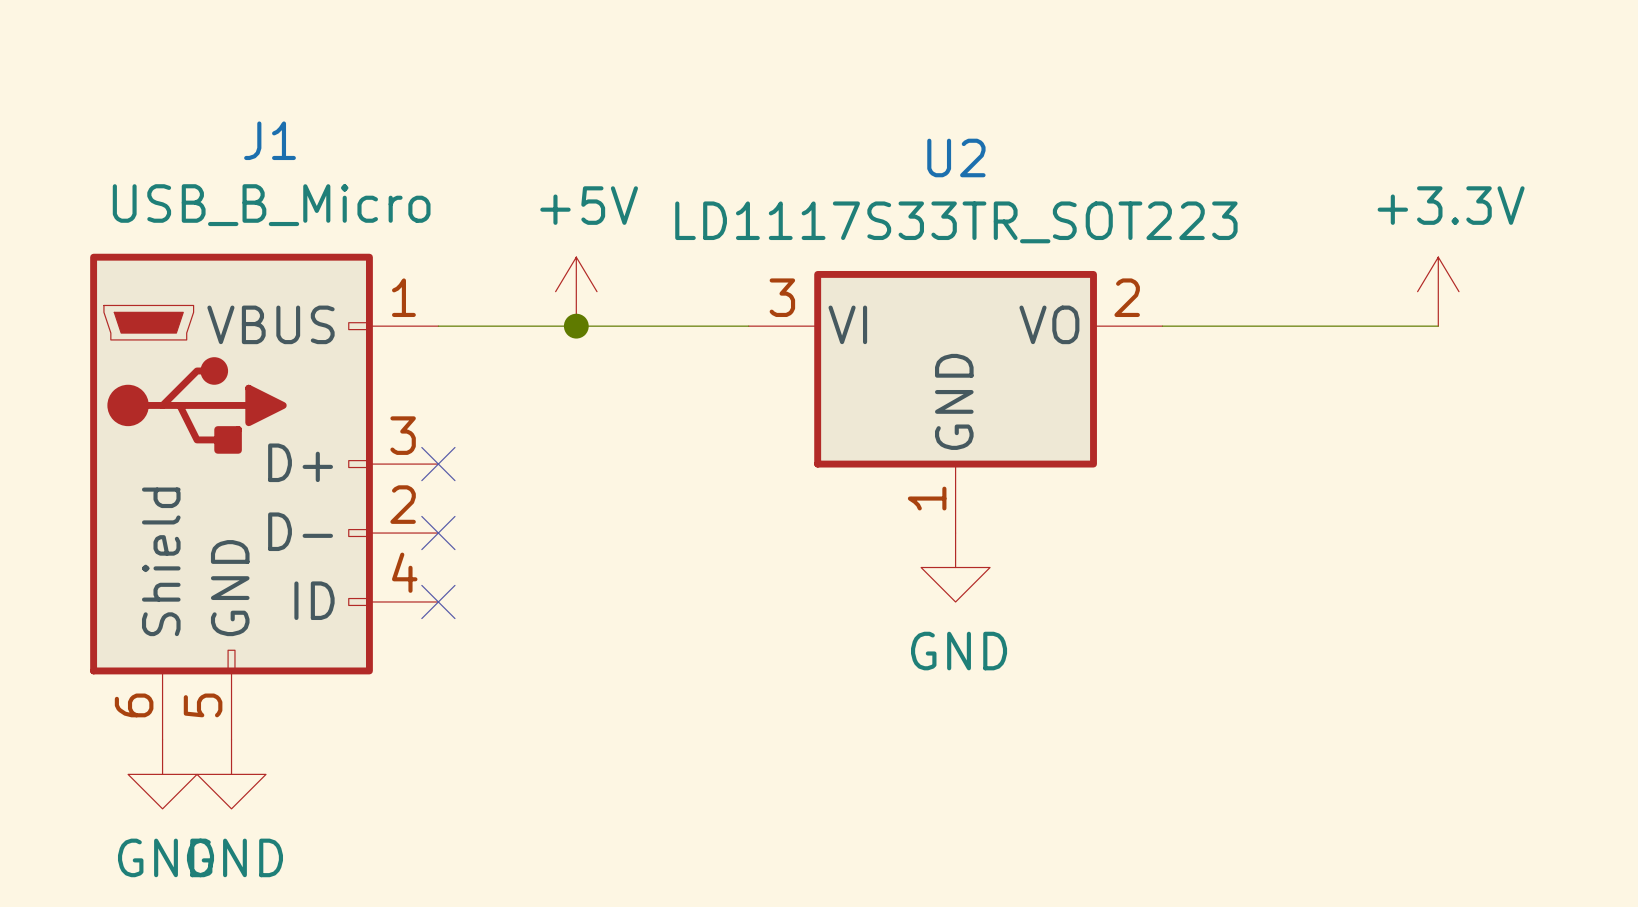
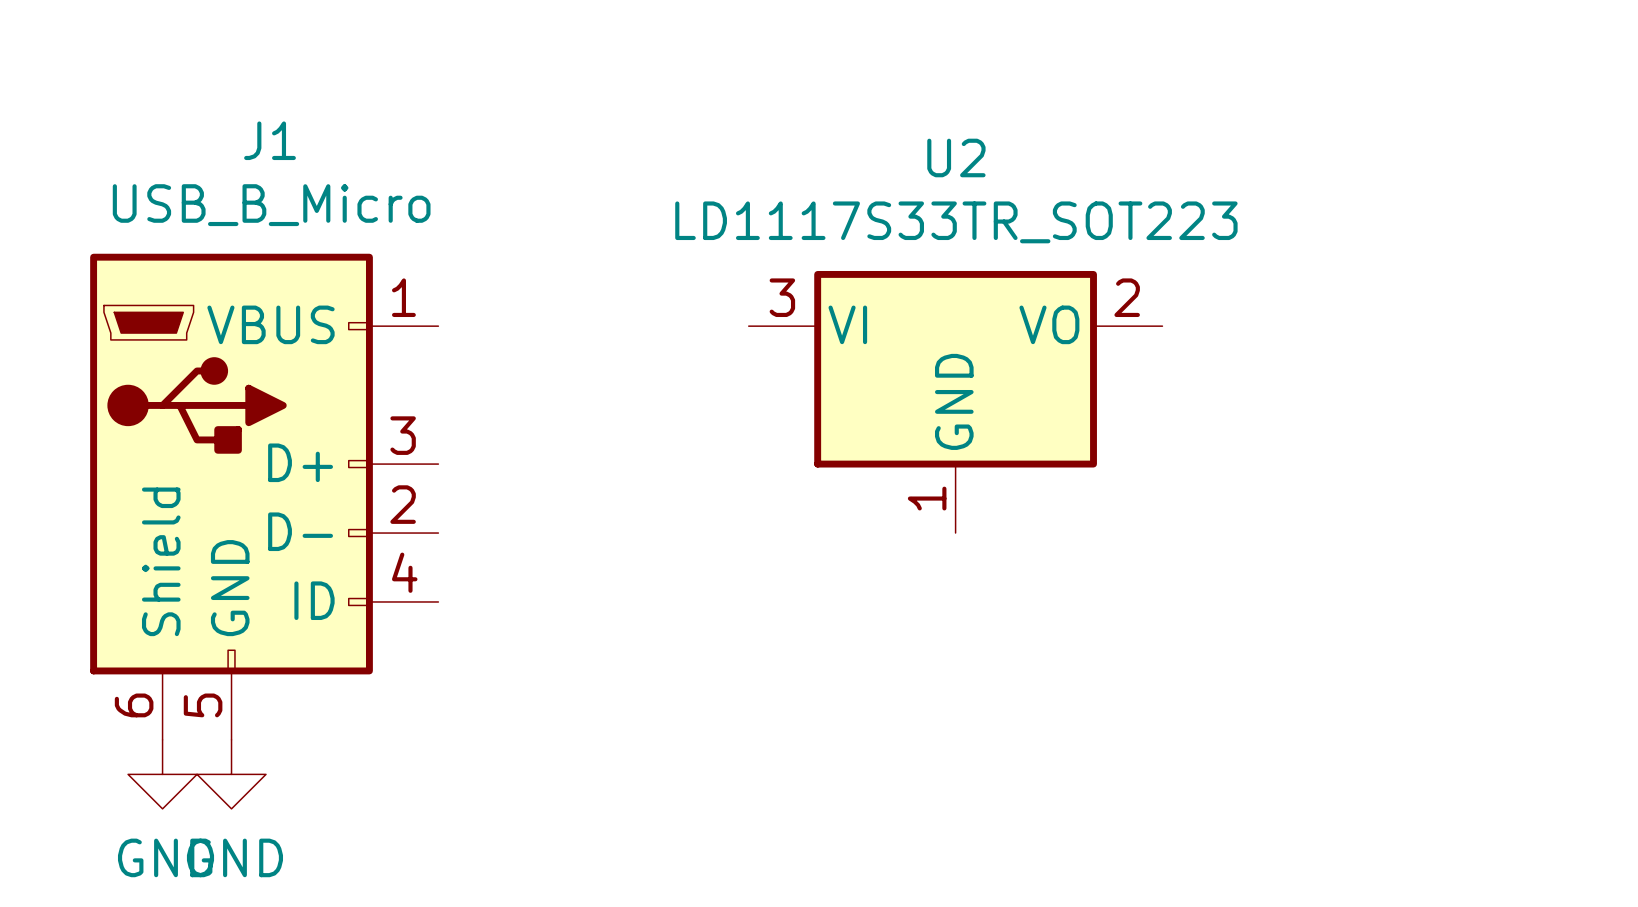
power symbol: +5V (576, 291) -> none
power symbol: +3.3V (1438, 291) -> none
wire: (438, 326) (748, 326) -> none
junction: (576, 326) -> none
wire: (1162, 326) (1438, 326) -> none
no-connect mark: (438, 464) -> none
no-connect mark: (438, 533) -> none
power symbol: GND (955, 567) -> none
no-connect mark: (438, 601) -> none

